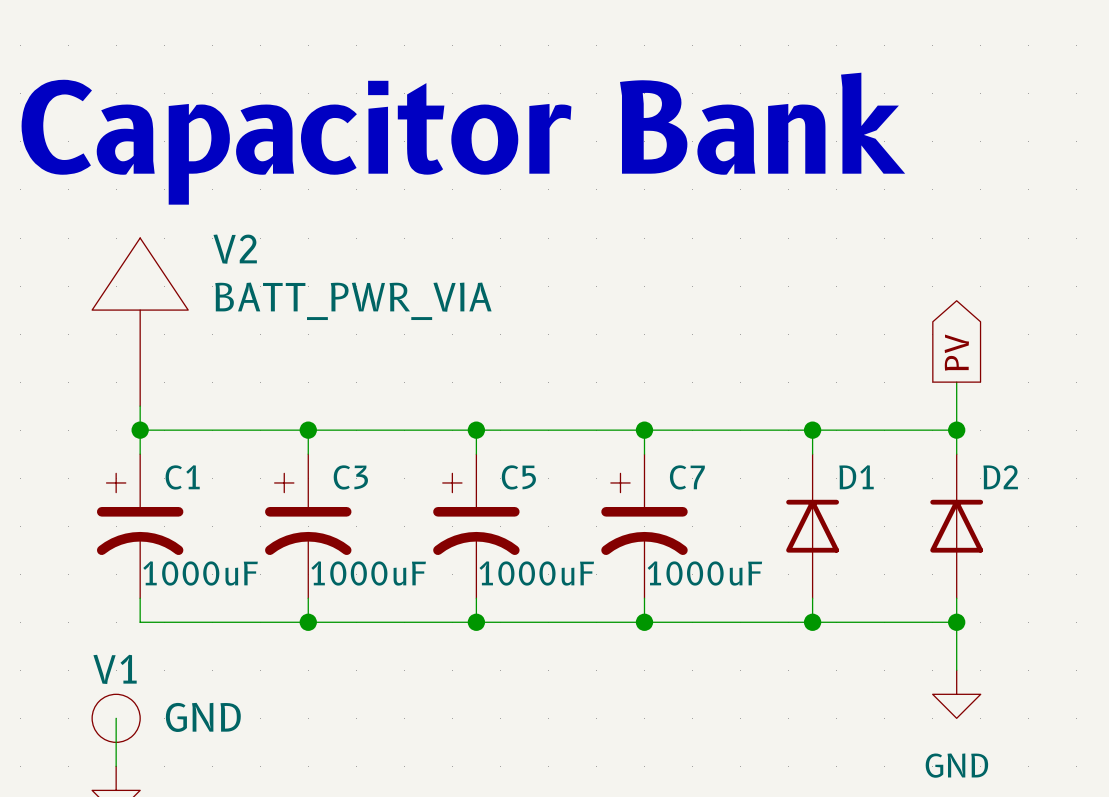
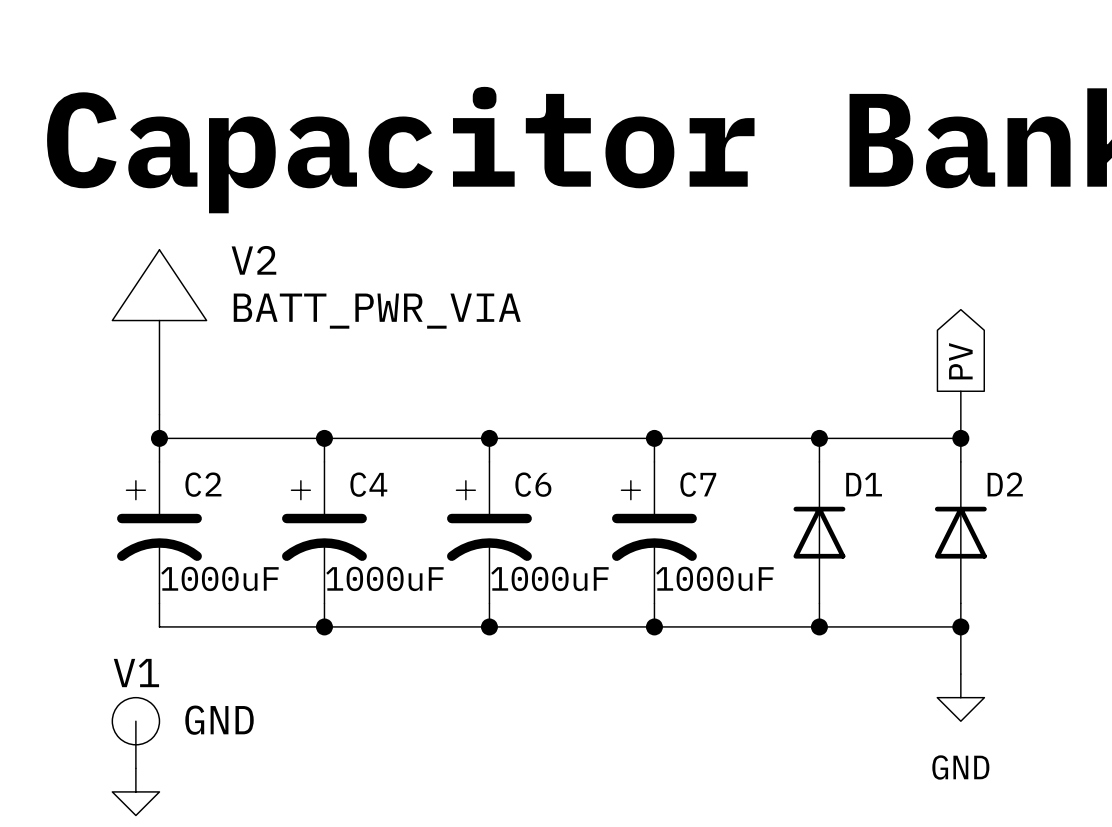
C1 name: C1 (182, 477) -> C2 (203, 484)
C3 name: C3 (350, 477) -> C4 (368, 484)
C5 name: C5 (518, 477) -> C6 (533, 484)

